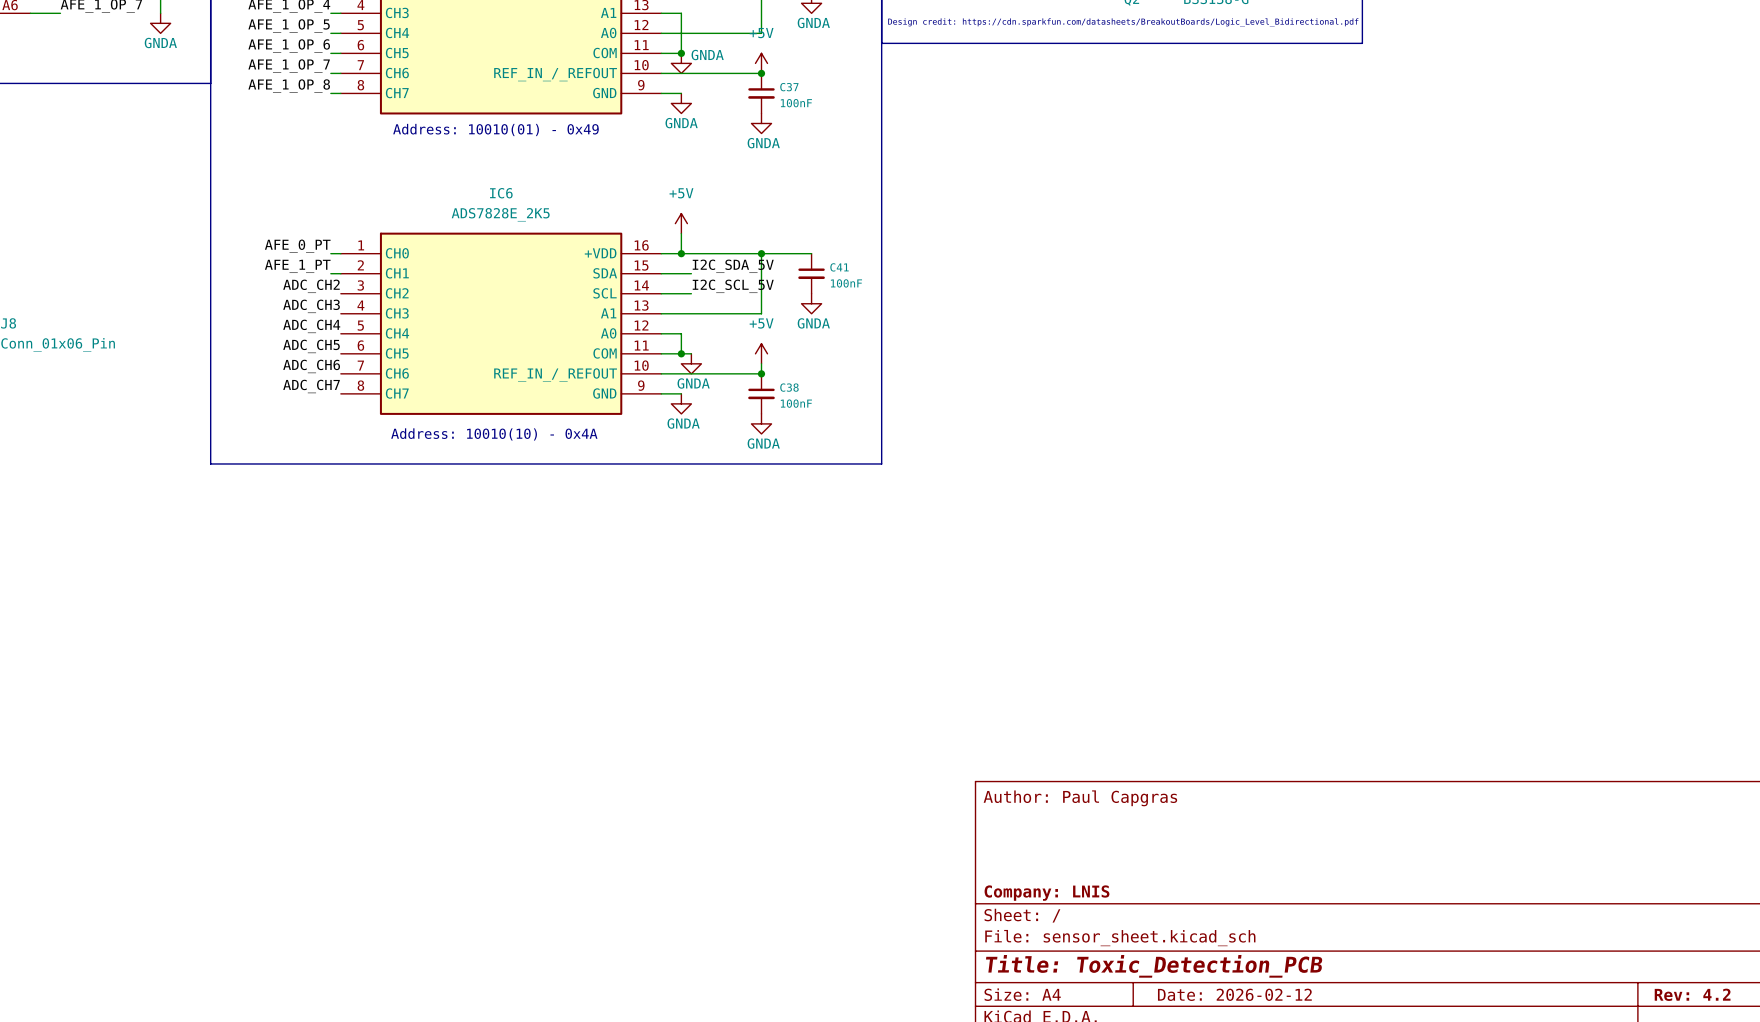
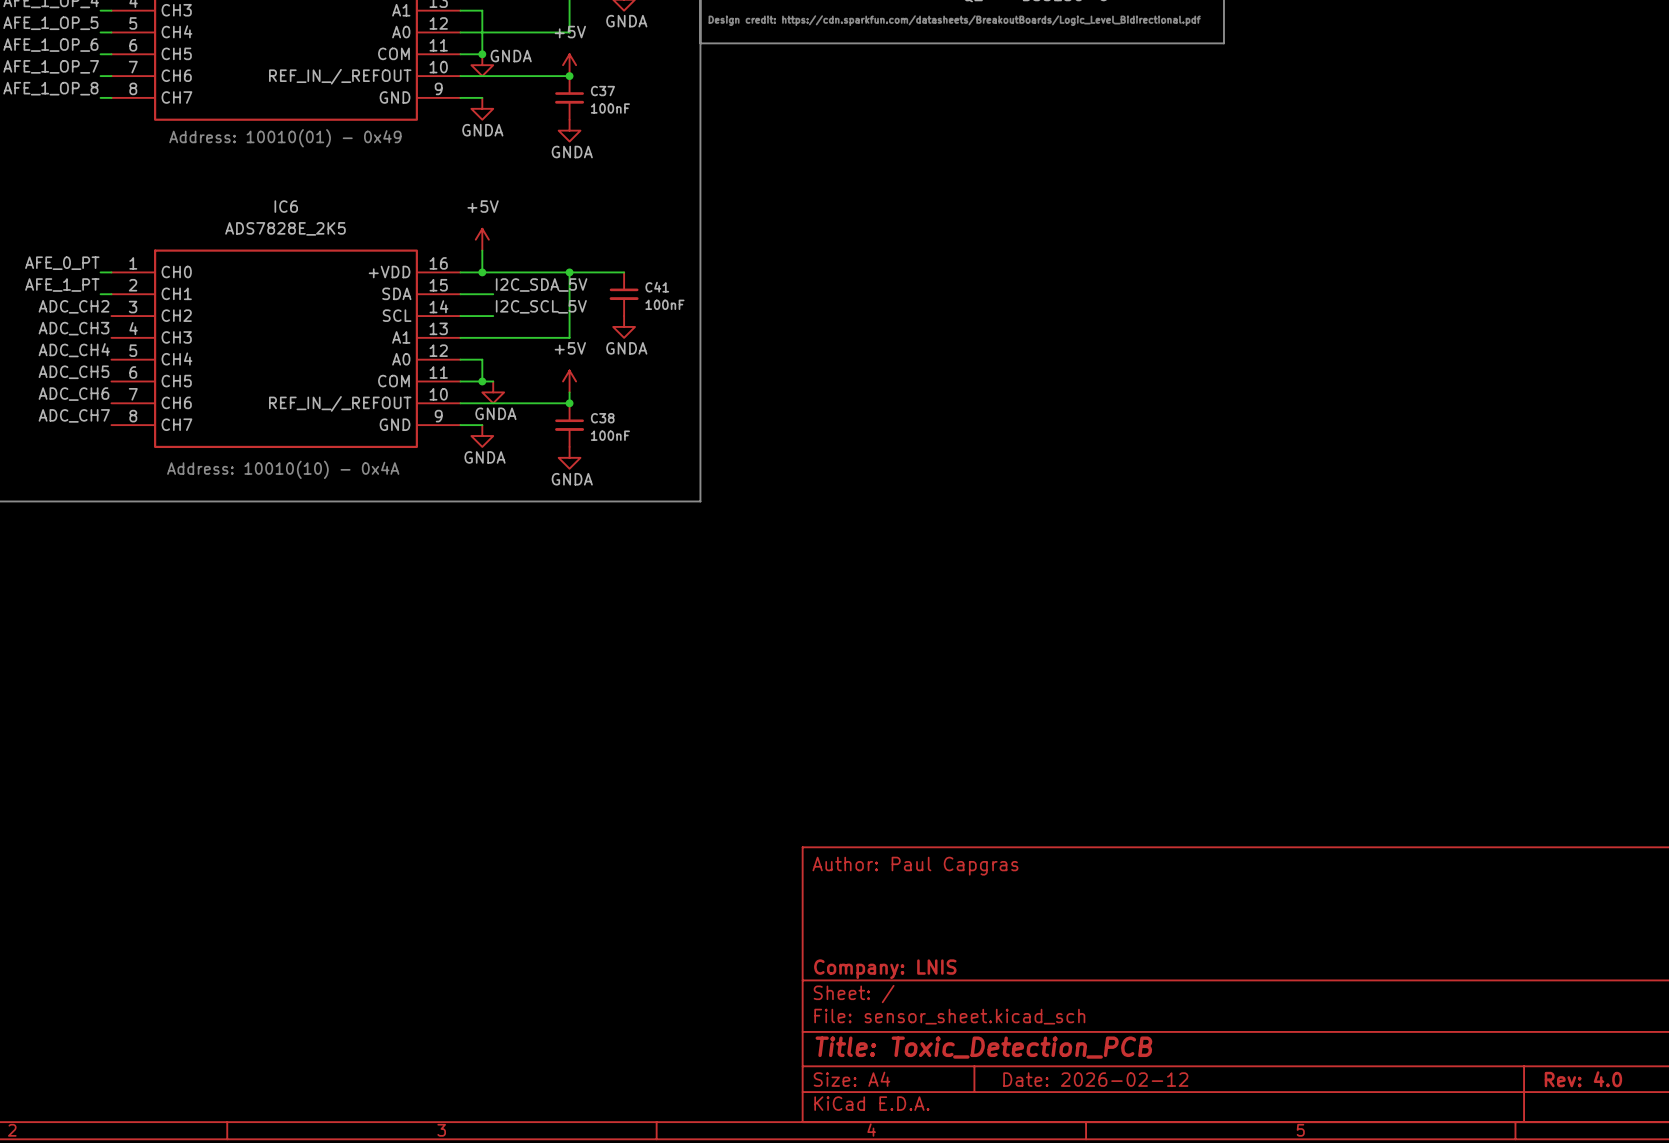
title block: Rev: 4.2 (1692, 994) -> Rev: 4.0 (1583, 1079)

